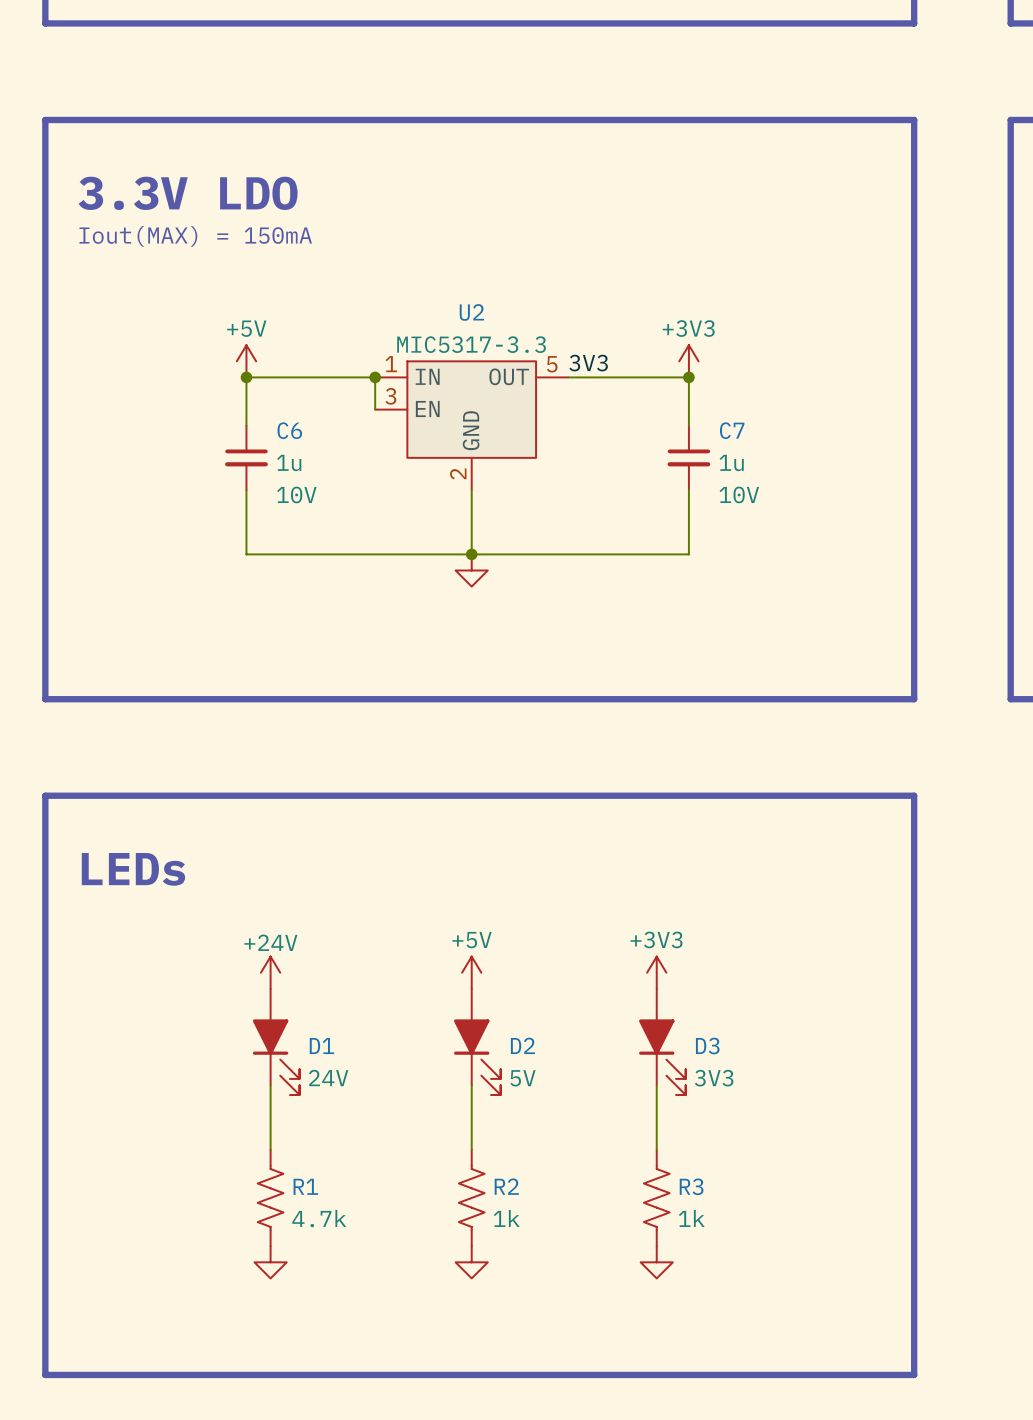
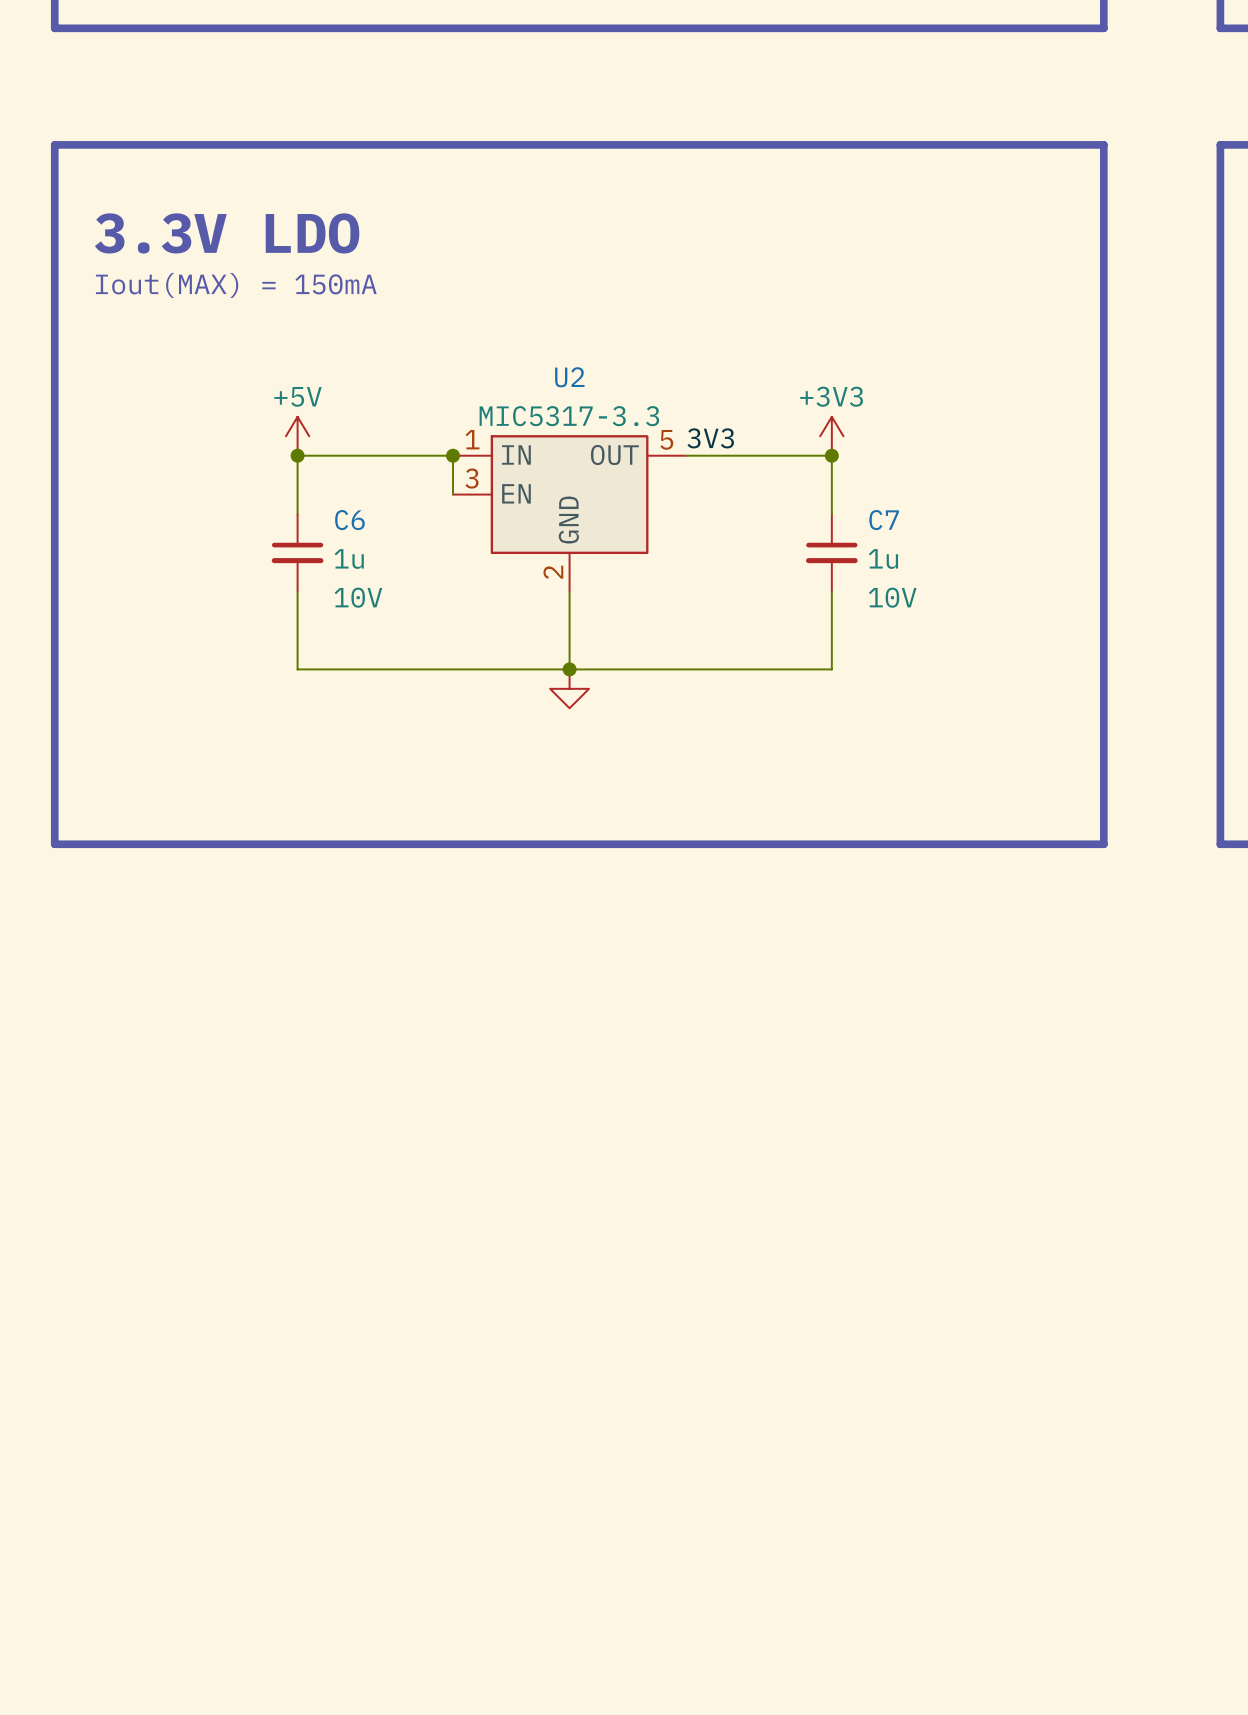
line: (45, 795) (45, 1374) (914, 1374) (914, 795) (45, 795) -> none
text: LEDs (133, 869) -> none
power symbol: +24V (270, 972) -> none
power symbol: +5V (471, 972) -> none
power symbol: +3V3 (656, 972) -> none
D1: 24V (276, 1041) -> none
D2: 5V (477, 1041) -> none
D3: 3V3 (662, 1041) -> none
wire: (270, 1085) (270, 1149) -> none
wire: (471, 1085) (471, 1149) -> none
wire: (656, 1085) (656, 1149) -> none
R1: 4.7k (270, 1197) -> none
R2: 1k (471, 1197) -> none
R3: 1k (656, 1197) -> none
power symbol: (270, 1262) -> none
power symbol: (471, 1262) -> none
power symbol: (656, 1262) -> none

